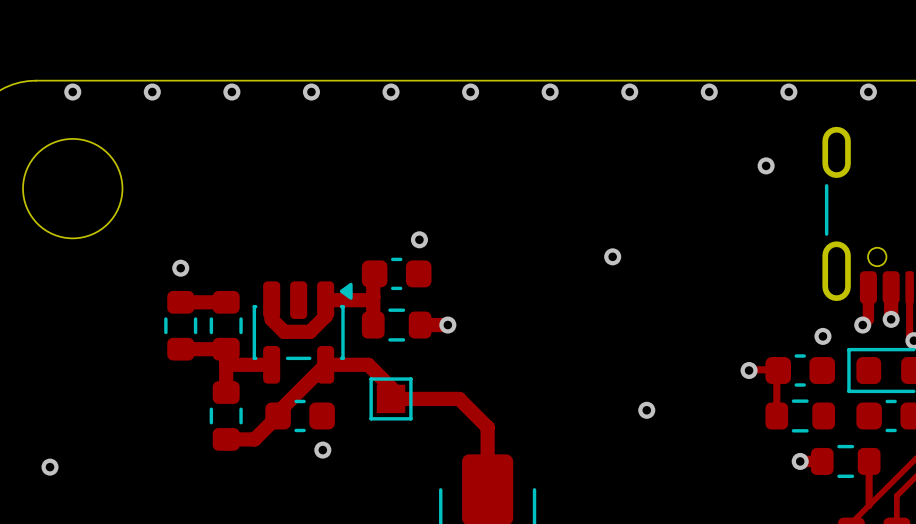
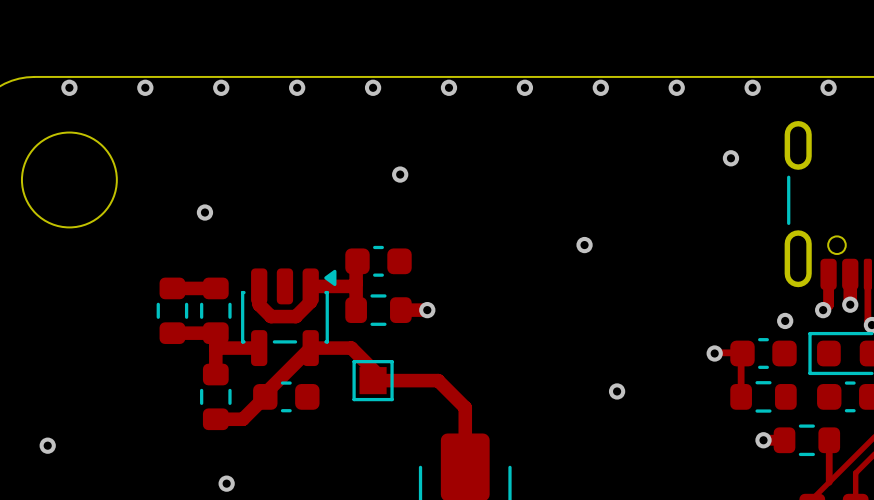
via position: (419, 239) -> (400, 174)
via position: (180, 268) -> (204, 212)
via: (322, 450) -> none
via: none -> (226, 483)

